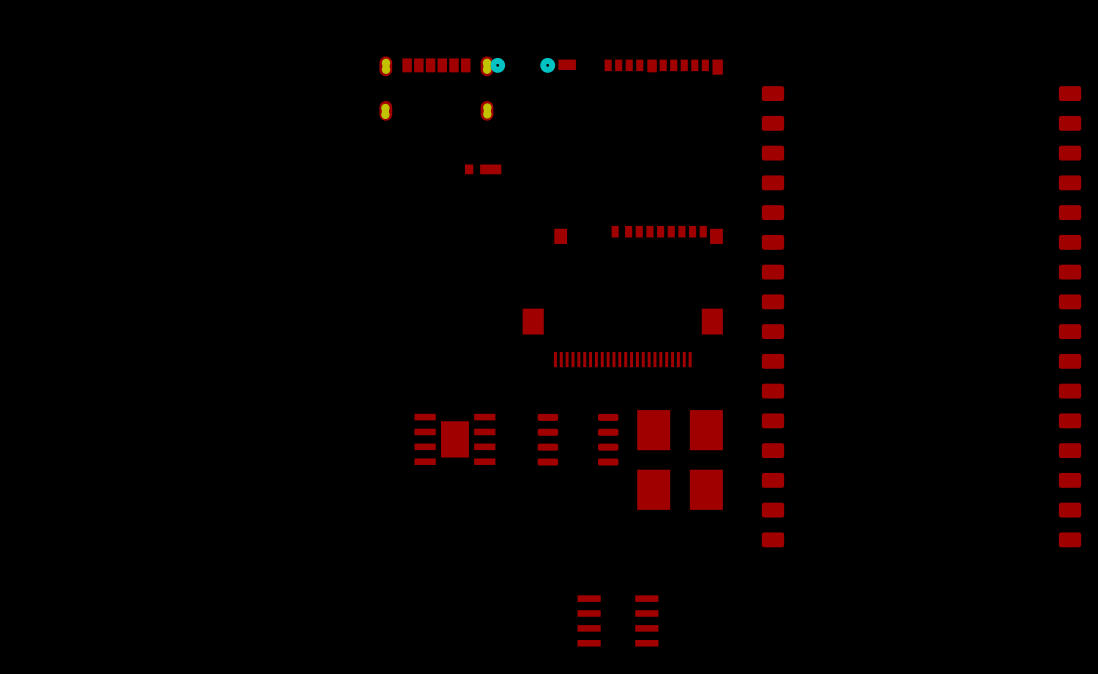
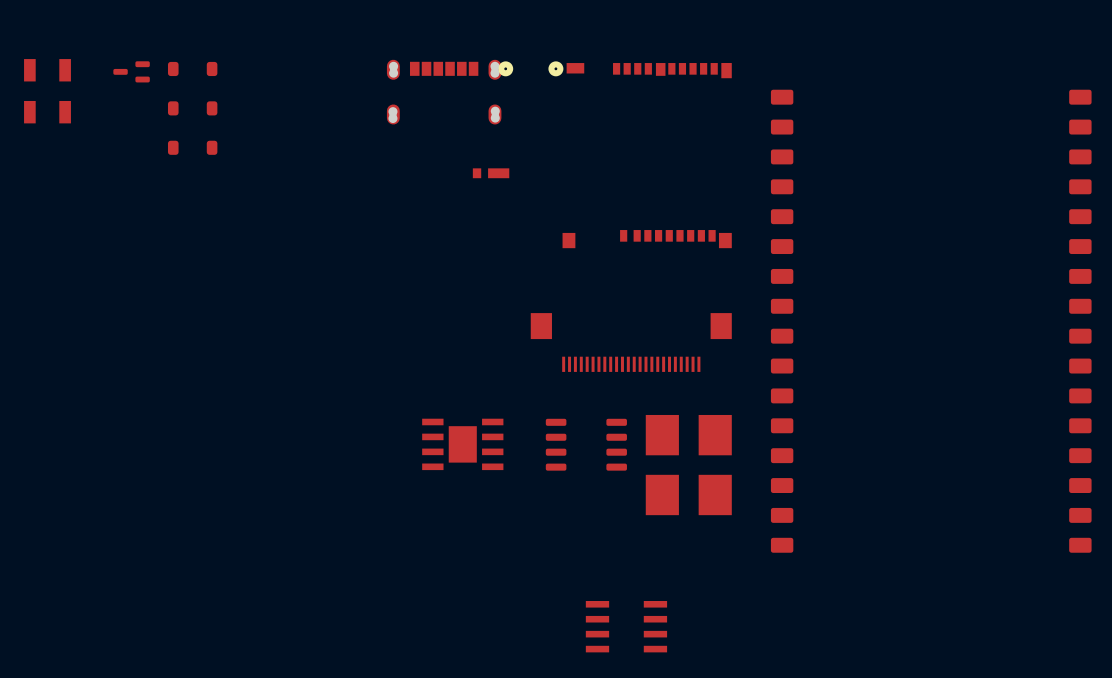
part: none -> (192, 68)
part: none -> (47, 70)
part: none -> (131, 71)
part: none -> (192, 108)
part: none -> (47, 112)
part: none -> (192, 147)

